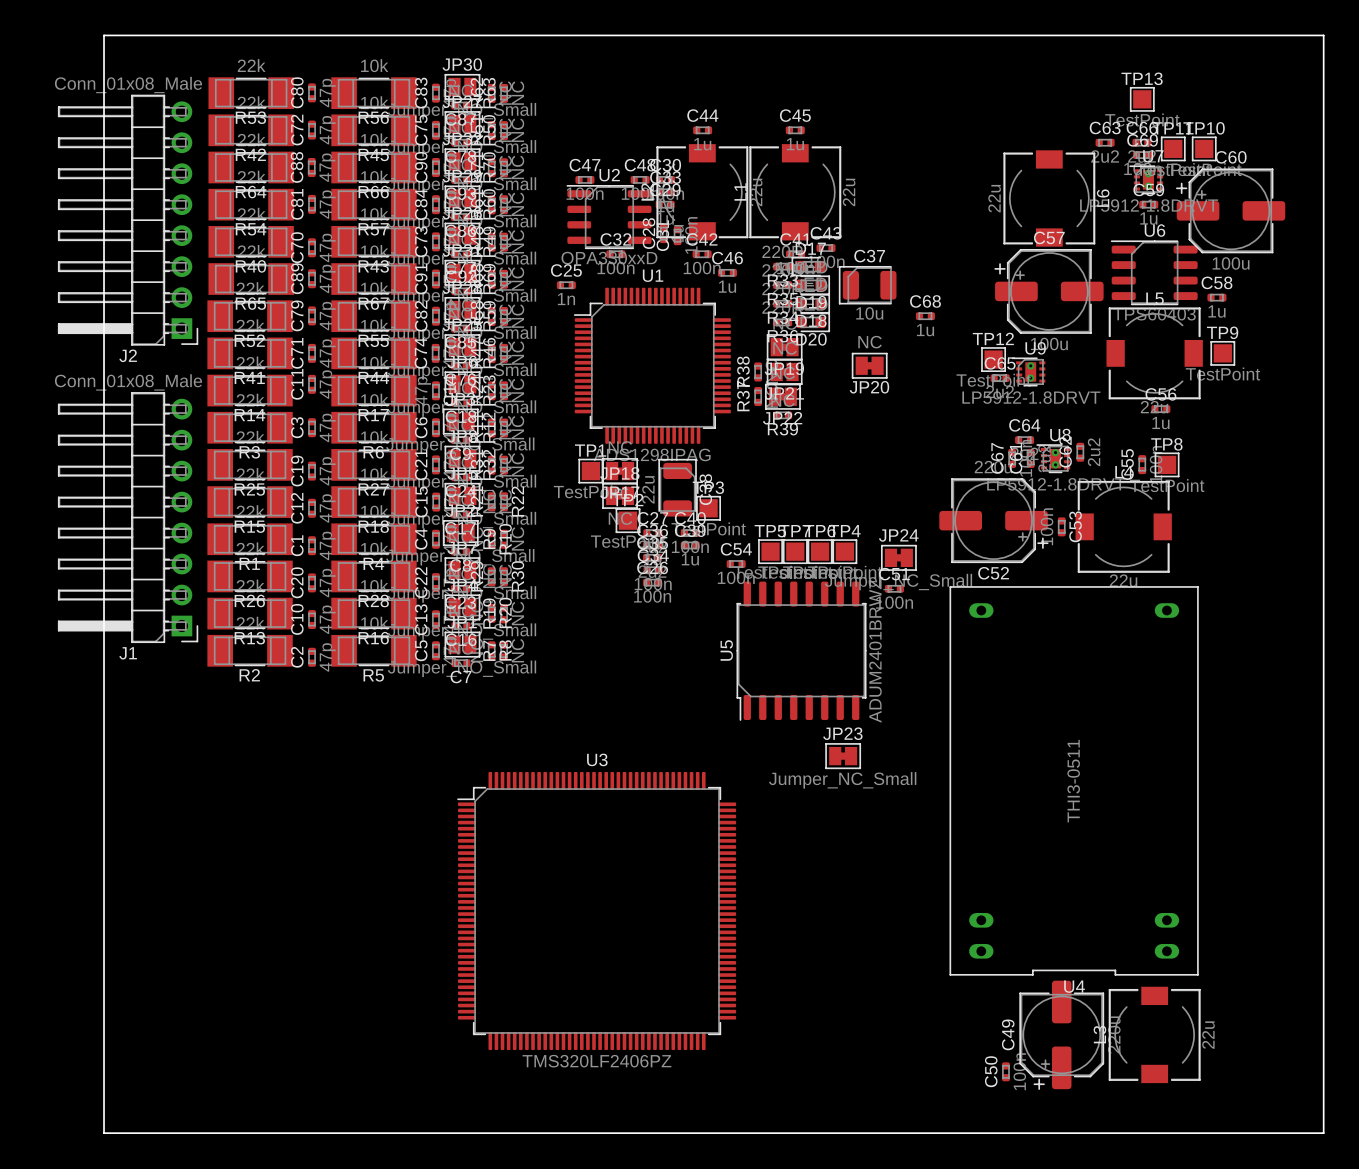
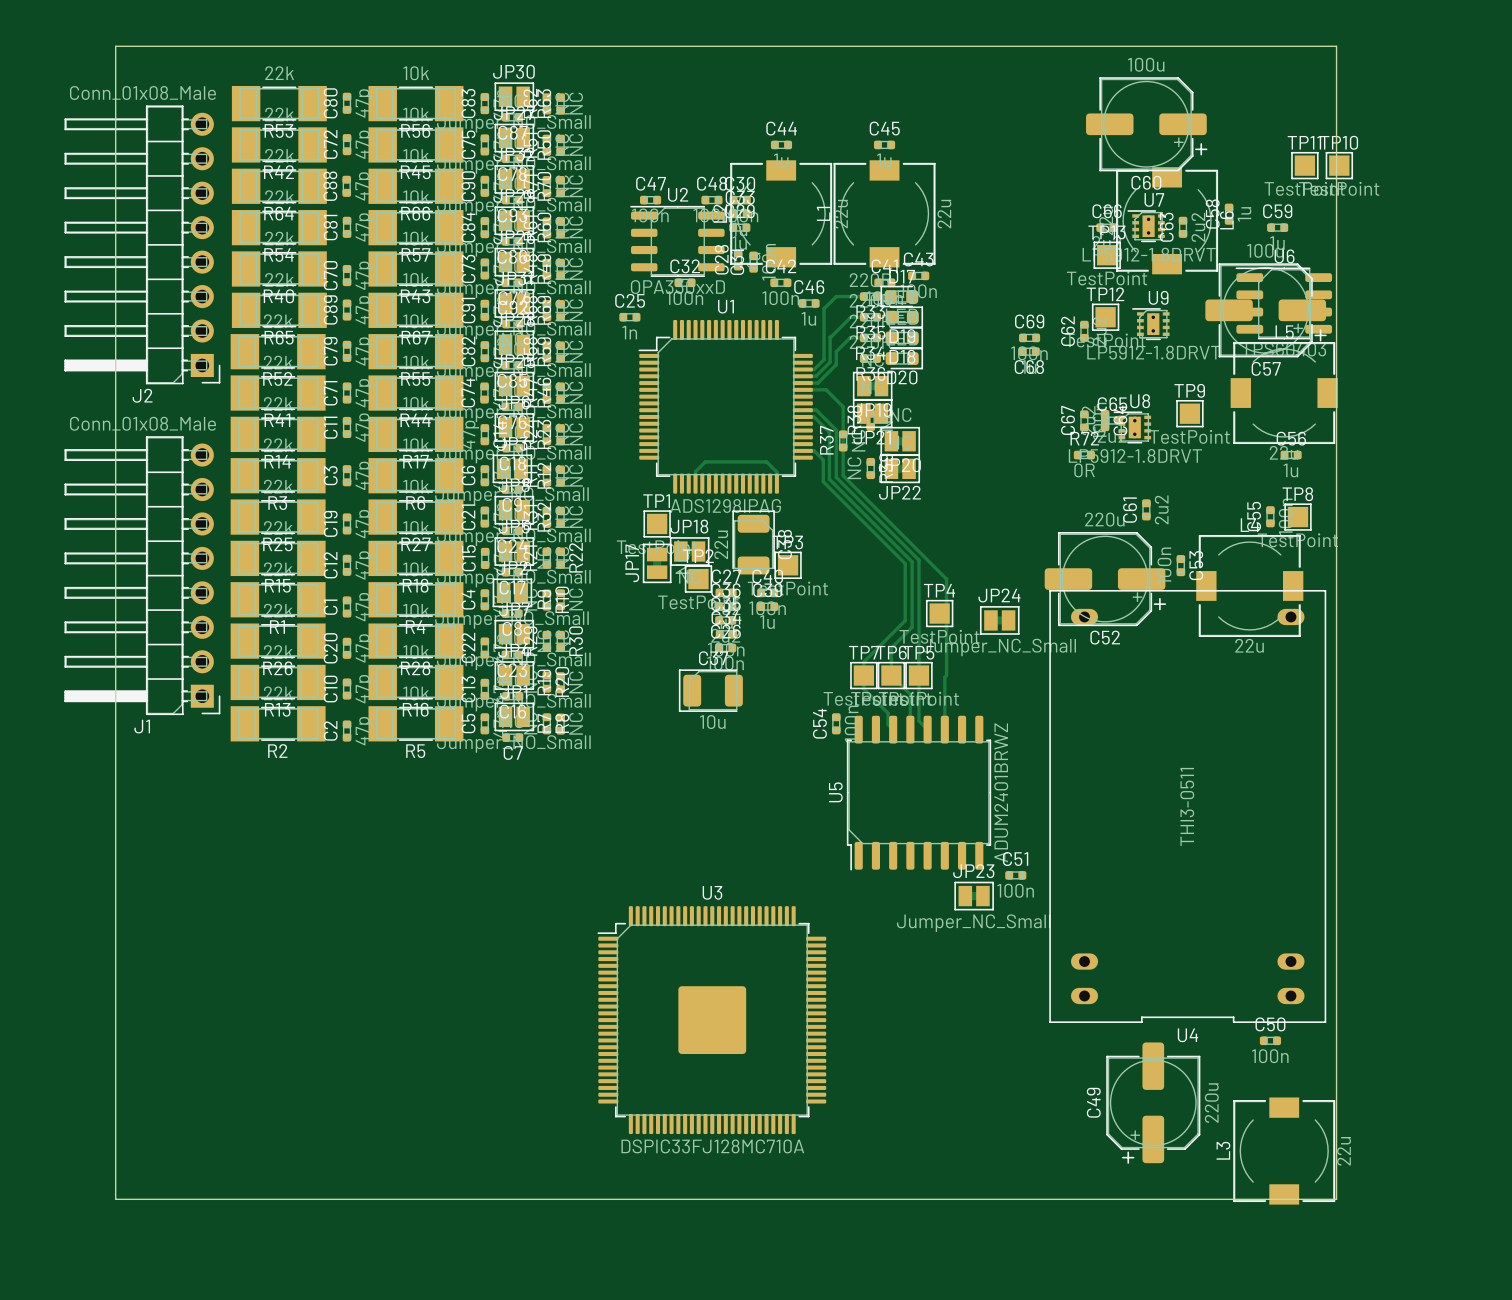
board edge: (104, 41) (104, 35) (1323, 35) (1323, 1133) (104, 1133) (104, 1078) -> (115, 46) (1336, 46) (1336, 1199) (115, 1199)
TP13 position: (1142, 99) -> (1107, 255)
C63 rotation: 0° (1105, 142) -> 90° clockwise (1183, 227)
C63 position: (1105, 142) -> (1183, 227)
C66 position: (1142, 142) -> (1106, 227)
C69 position: (1142, 155) -> (1029, 337)
U7 position: (1146, 179) -> (1146, 226)
C60 rotation: 0° (1230, 210) -> 180° (1146, 124)
C60 position: (1230, 210) -> (1146, 124)
track: none -> (863, 296) (836, 296) (824, 308) (824, 359) (814, 369) (802, 369)
track: none -> (864, 317) (850, 317) (830, 337) (830, 362) (816, 376) (802, 376)
C37 position: (867, 285) -> (710, 690)
C57 rotation: 0° (1049, 291) -> 180° (1266, 310)
C57 position: (1049, 291) -> (1266, 310)
C58 rotation: 0° (1216, 297) -> 90° clockwise (1229, 214)
C58 position: (1216, 297) -> (1229, 214)
C68 name position: C68 (925, 301) -> C68 (1029, 367)
track: none -> (863, 337) (850, 337) (836, 351) (836, 364) (817, 383) (802, 383)
track: none -> (802, 389) (826, 389) (843, 406) (843, 475) (946, 579) (944, 729)
TP9 position: (1222, 353) -> (1189, 413)
TP12 position: (993, 359) -> (1105, 317)
JP20 position: (869, 365) -> (900, 441)
track: none -> (802, 410) (816, 410) (836, 430) (836, 477) (918, 560) (918, 721) (927, 729)
R38 position: (758, 371) -> (870, 420)
U9 position: (1028, 371) -> (1150, 324)
track: none -> (802, 416) (814, 416) (829, 432) (829, 479) (912, 561) (912, 627) (891, 647) (891, 675) (910, 694) (910, 729)
JP22 position: (782, 396) -> (900, 468)
track: none -> (802, 450) (814, 450) (823, 459) (823, 481) (905, 563) (905, 620) (863, 661) (863, 689) (888, 713) (888, 724) (893, 729)
R72: none -> 0R (1084, 455)
R39 rotation: 0° (782, 415) -> 90° clockwise (870, 468)
track: none -> (695, 483) (695, 471) (705, 461) (766, 461) (776, 472) (776, 483)
C64 rotation: 0° (1024, 440) -> 90° clockwise (1105, 420)
C64 position: (1024, 440) -> (1105, 420)
C62 position: (1080, 452) -> (1084, 331)
C67 position: (1012, 458) -> (1084, 420)
U8 position: (1053, 458) -> (1132, 427)
JP17 rotation: 0° (620, 471) -> 90° clockwise (657, 563)
JP17 position: (620, 471) -> (657, 563)
C53 position: (1061, 526) -> (1180, 565)
TP5 position: (770, 551) -> (918, 675)
TP7 position: (795, 551) -> (863, 675)
TP6 position: (820, 551) -> (891, 675)
C54 rotation: 0° (736, 564) -> 90° clockwise (836, 723)
C54 position: (736, 564) -> (836, 723)
C51 position: (894, 588) -> (1015, 875)
U5 position: (801, 651) -> (918, 793)
JP23 position: (843, 756) -> (974, 896)
U3 name position: U3 (597, 759) -> U3 (712, 892)
U3 footprint: [457, 771, 737, 1051] -> [597, 906, 827, 1135]
U4 position: (1074, 780) -> (1187, 806)
C49 position: (1061, 1035) -> (1153, 1103)
U3 value: TMS320LF2406PZ (596, 1061) -> DSPIC33FJ128MC710A (712, 1146)
C50 rotation: 0° (1005, 1071) -> 90° clockwise (1270, 1040)
C50 position: (1005, 1071) -> (1270, 1040)

